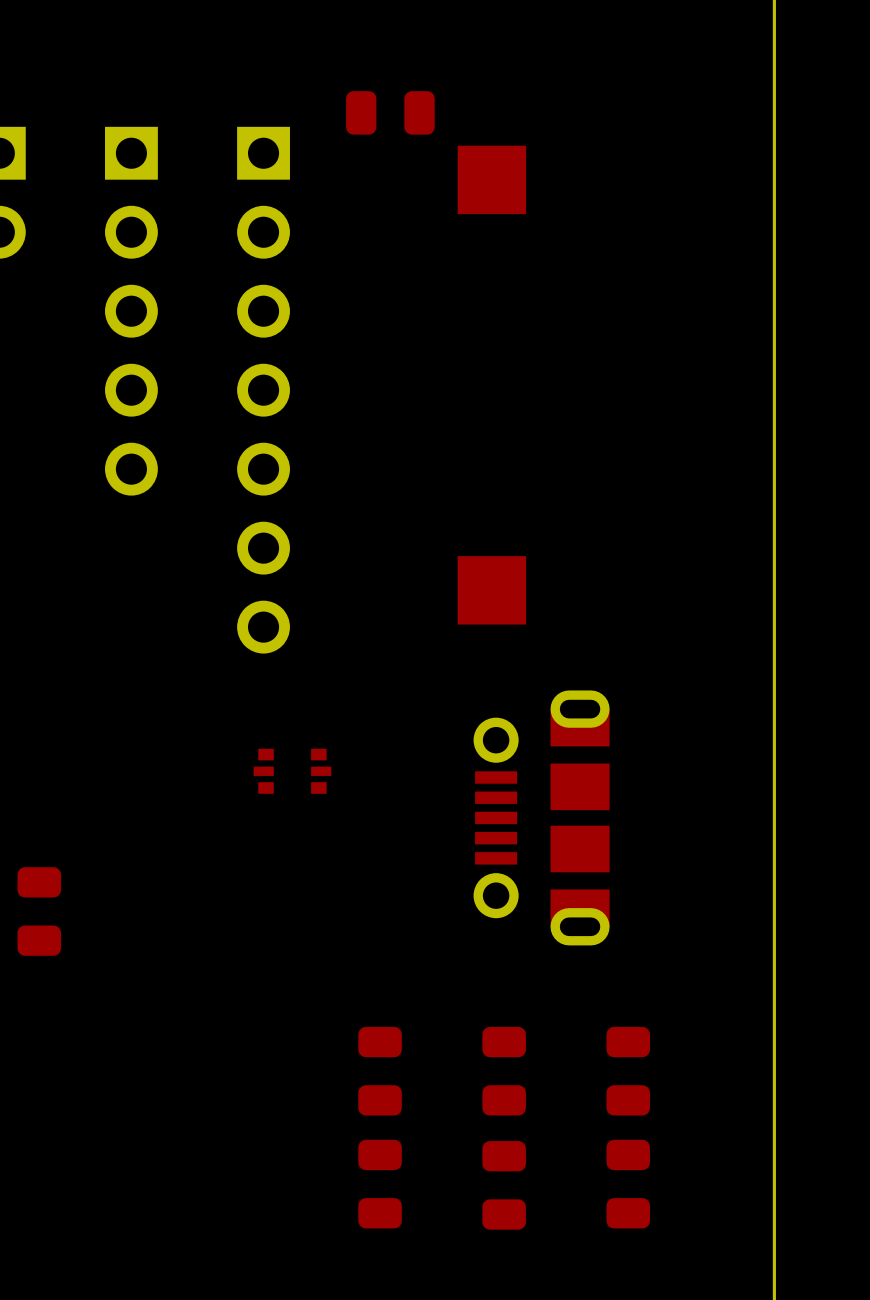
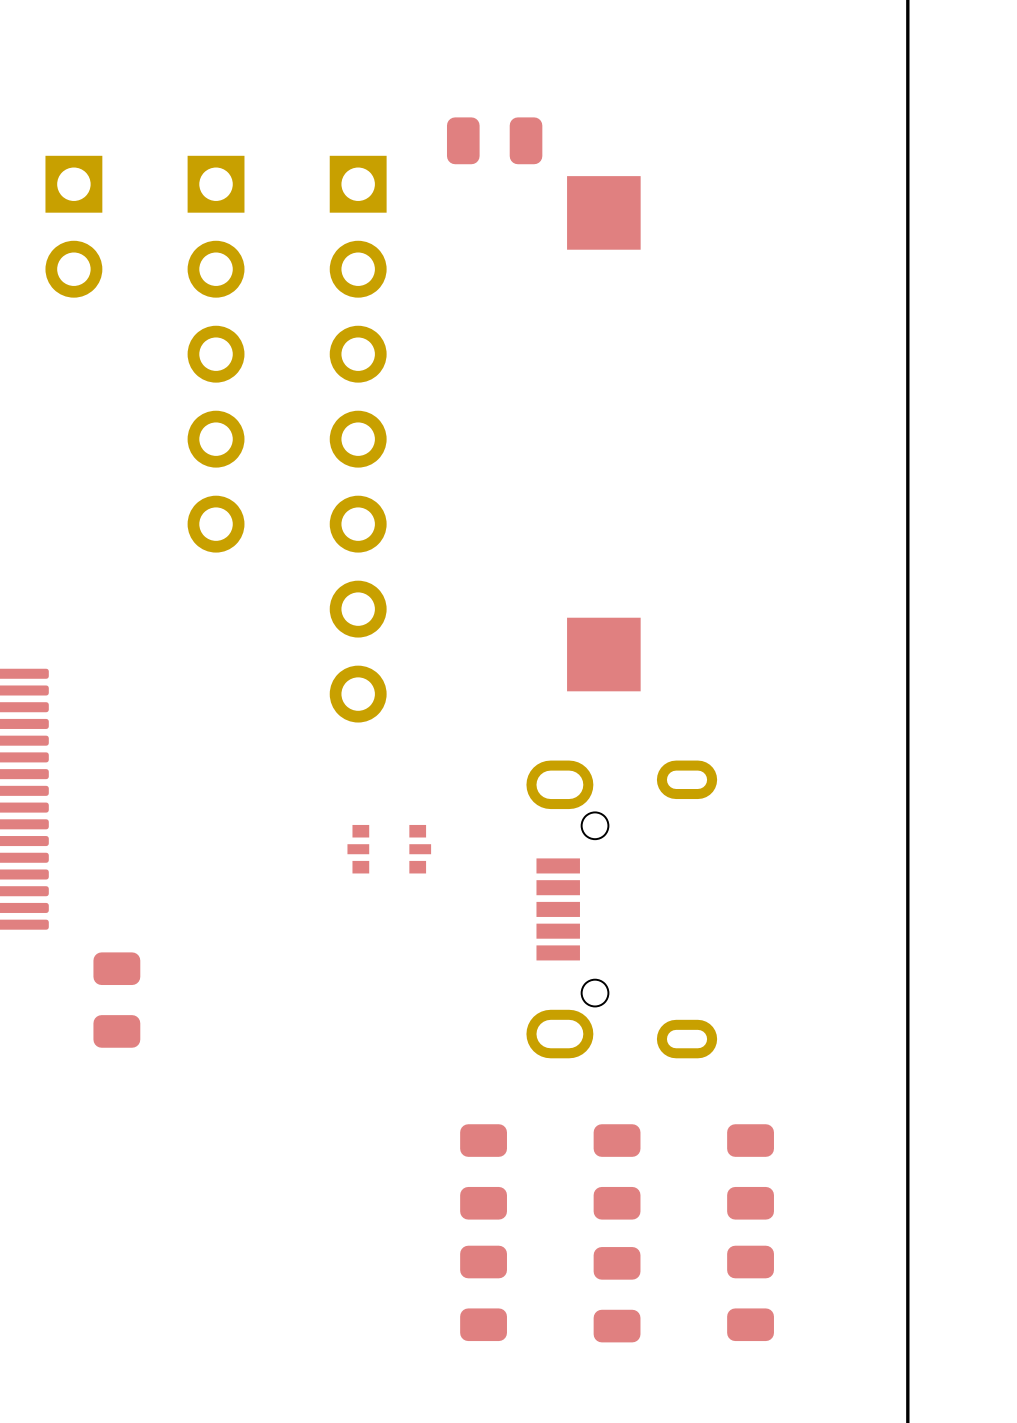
part: (541, 817) -> none
part: none -> (621, 909)

